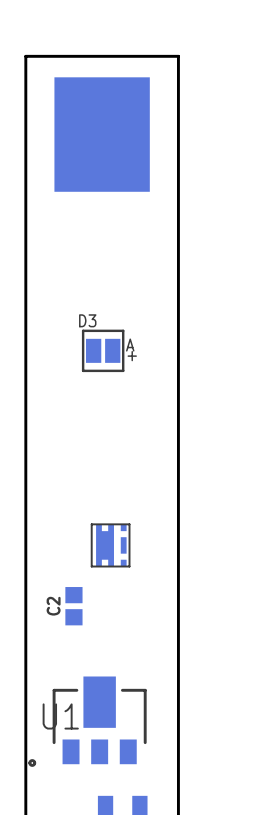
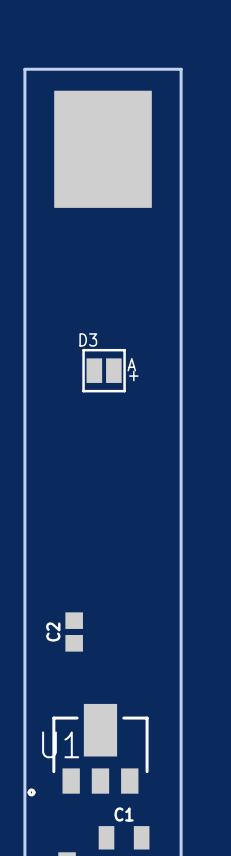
part: (110, 545) -> none
C1 name: none -> C1 (124, 814)

